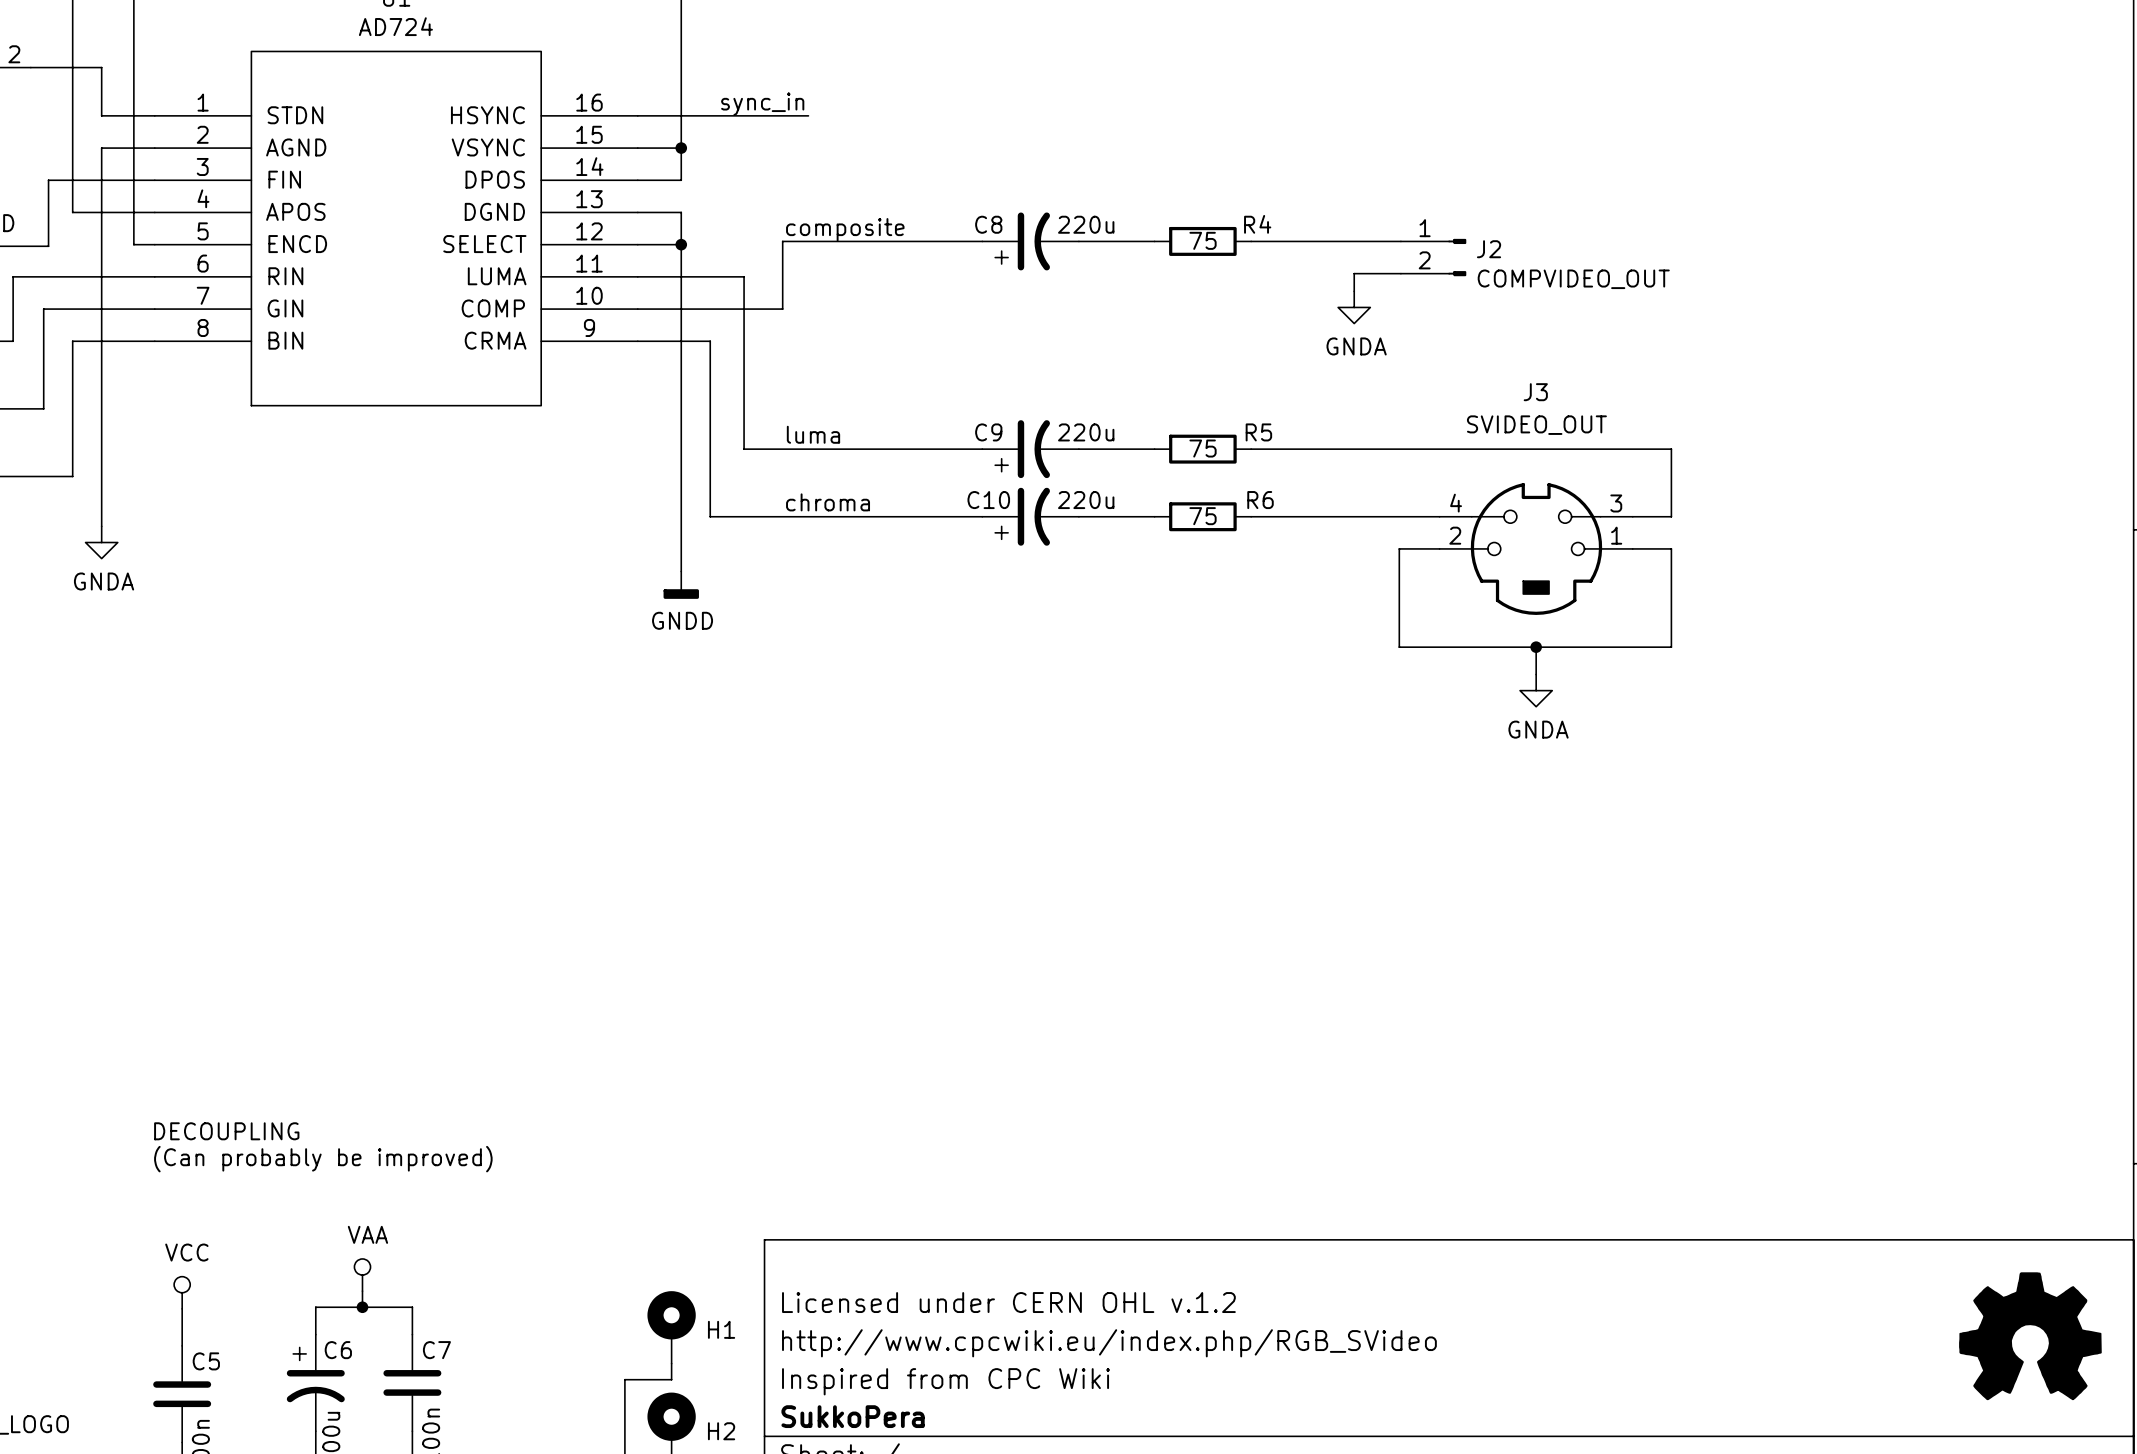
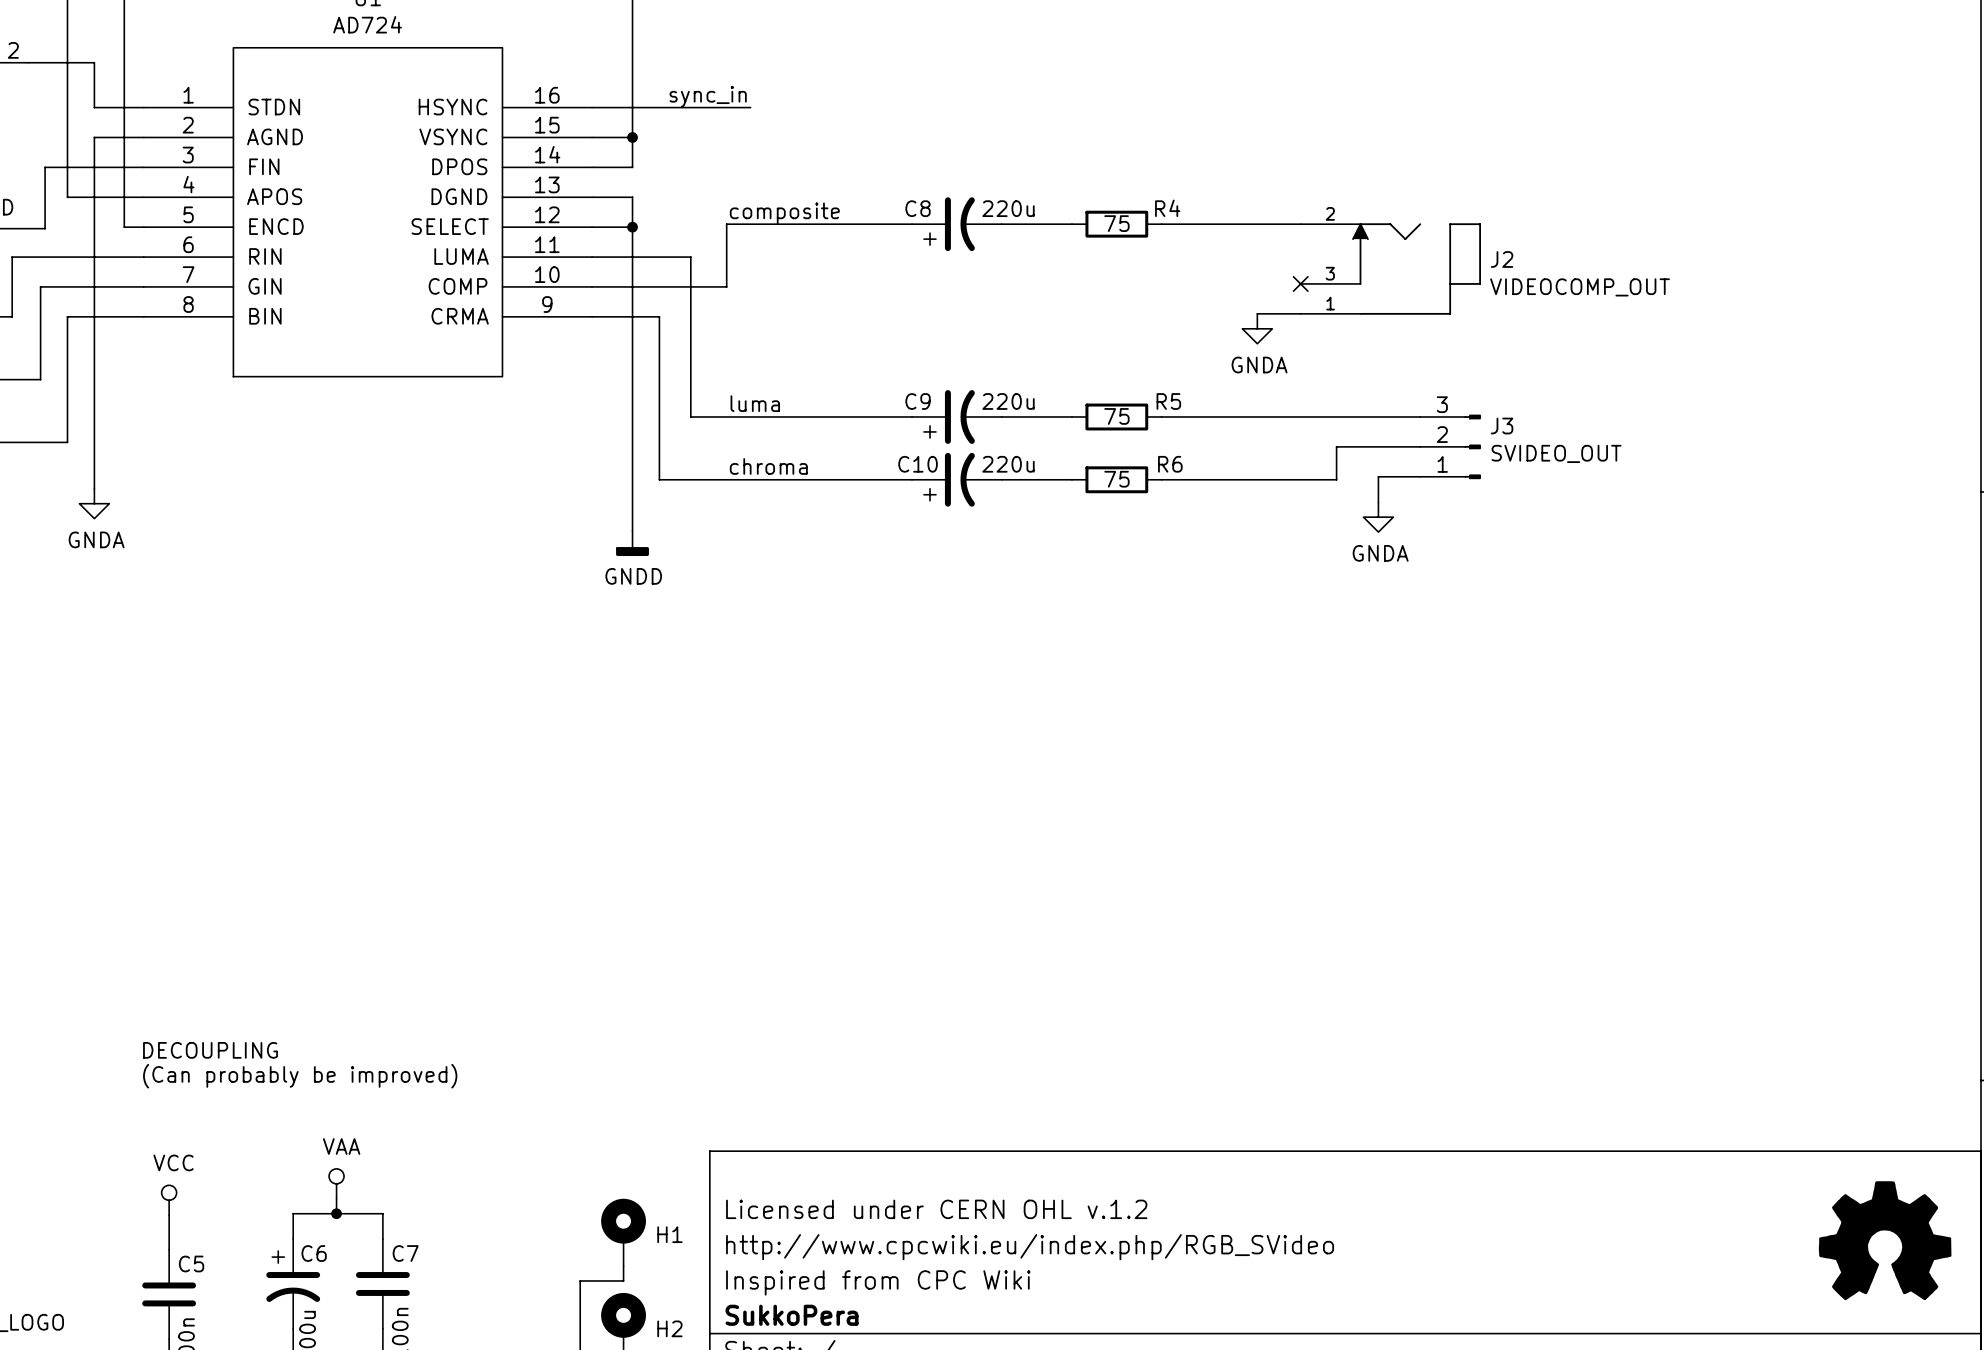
J2 symbol: [1400, 238, 1467, 277] -> [1300, 223, 1481, 315]
J2 name position: J2 (1489, 249) -> J2 (1502, 259)
wire: (1400, 273) (1354, 273) (1354, 291) -> none
J2 value: COMPVIDEO_OUT (1573, 279) -> VIDEOCOMP_OUT (1580, 287)
no-connect mark: none -> (1300, 283)
power symbol position: GNDA (1354, 307) -> GNDA (1257, 328)
wire: none -> (1257, 313) (1300, 313)
J3 name position: J3 (1535, 392) -> J3 (1502, 426)
J3 value position: SVIDEO_OUT (1536, 425) -> SVIDEO_OUT (1556, 453)
wire: (1529, 449) (1671, 449) (1671, 516) (1632, 516) -> none
wire: none -> (1420, 446) (1336, 446) (1336, 479)
J3 symbol: [1439, 482, 1633, 615] -> [1420, 414, 1481, 480]
wire: none -> (1420, 476) (1378, 476) (1378, 502)
wire: (1439, 548) (1399, 548) (1399, 647) (1671, 647) (1671, 548) (1632, 548) -> none
power symbol: none -> GNDA (1378, 517)
wire: (1536, 647) (1536, 674) -> none
junction: (1536, 647) -> none
power symbol: GNDA (1536, 690) -> none

